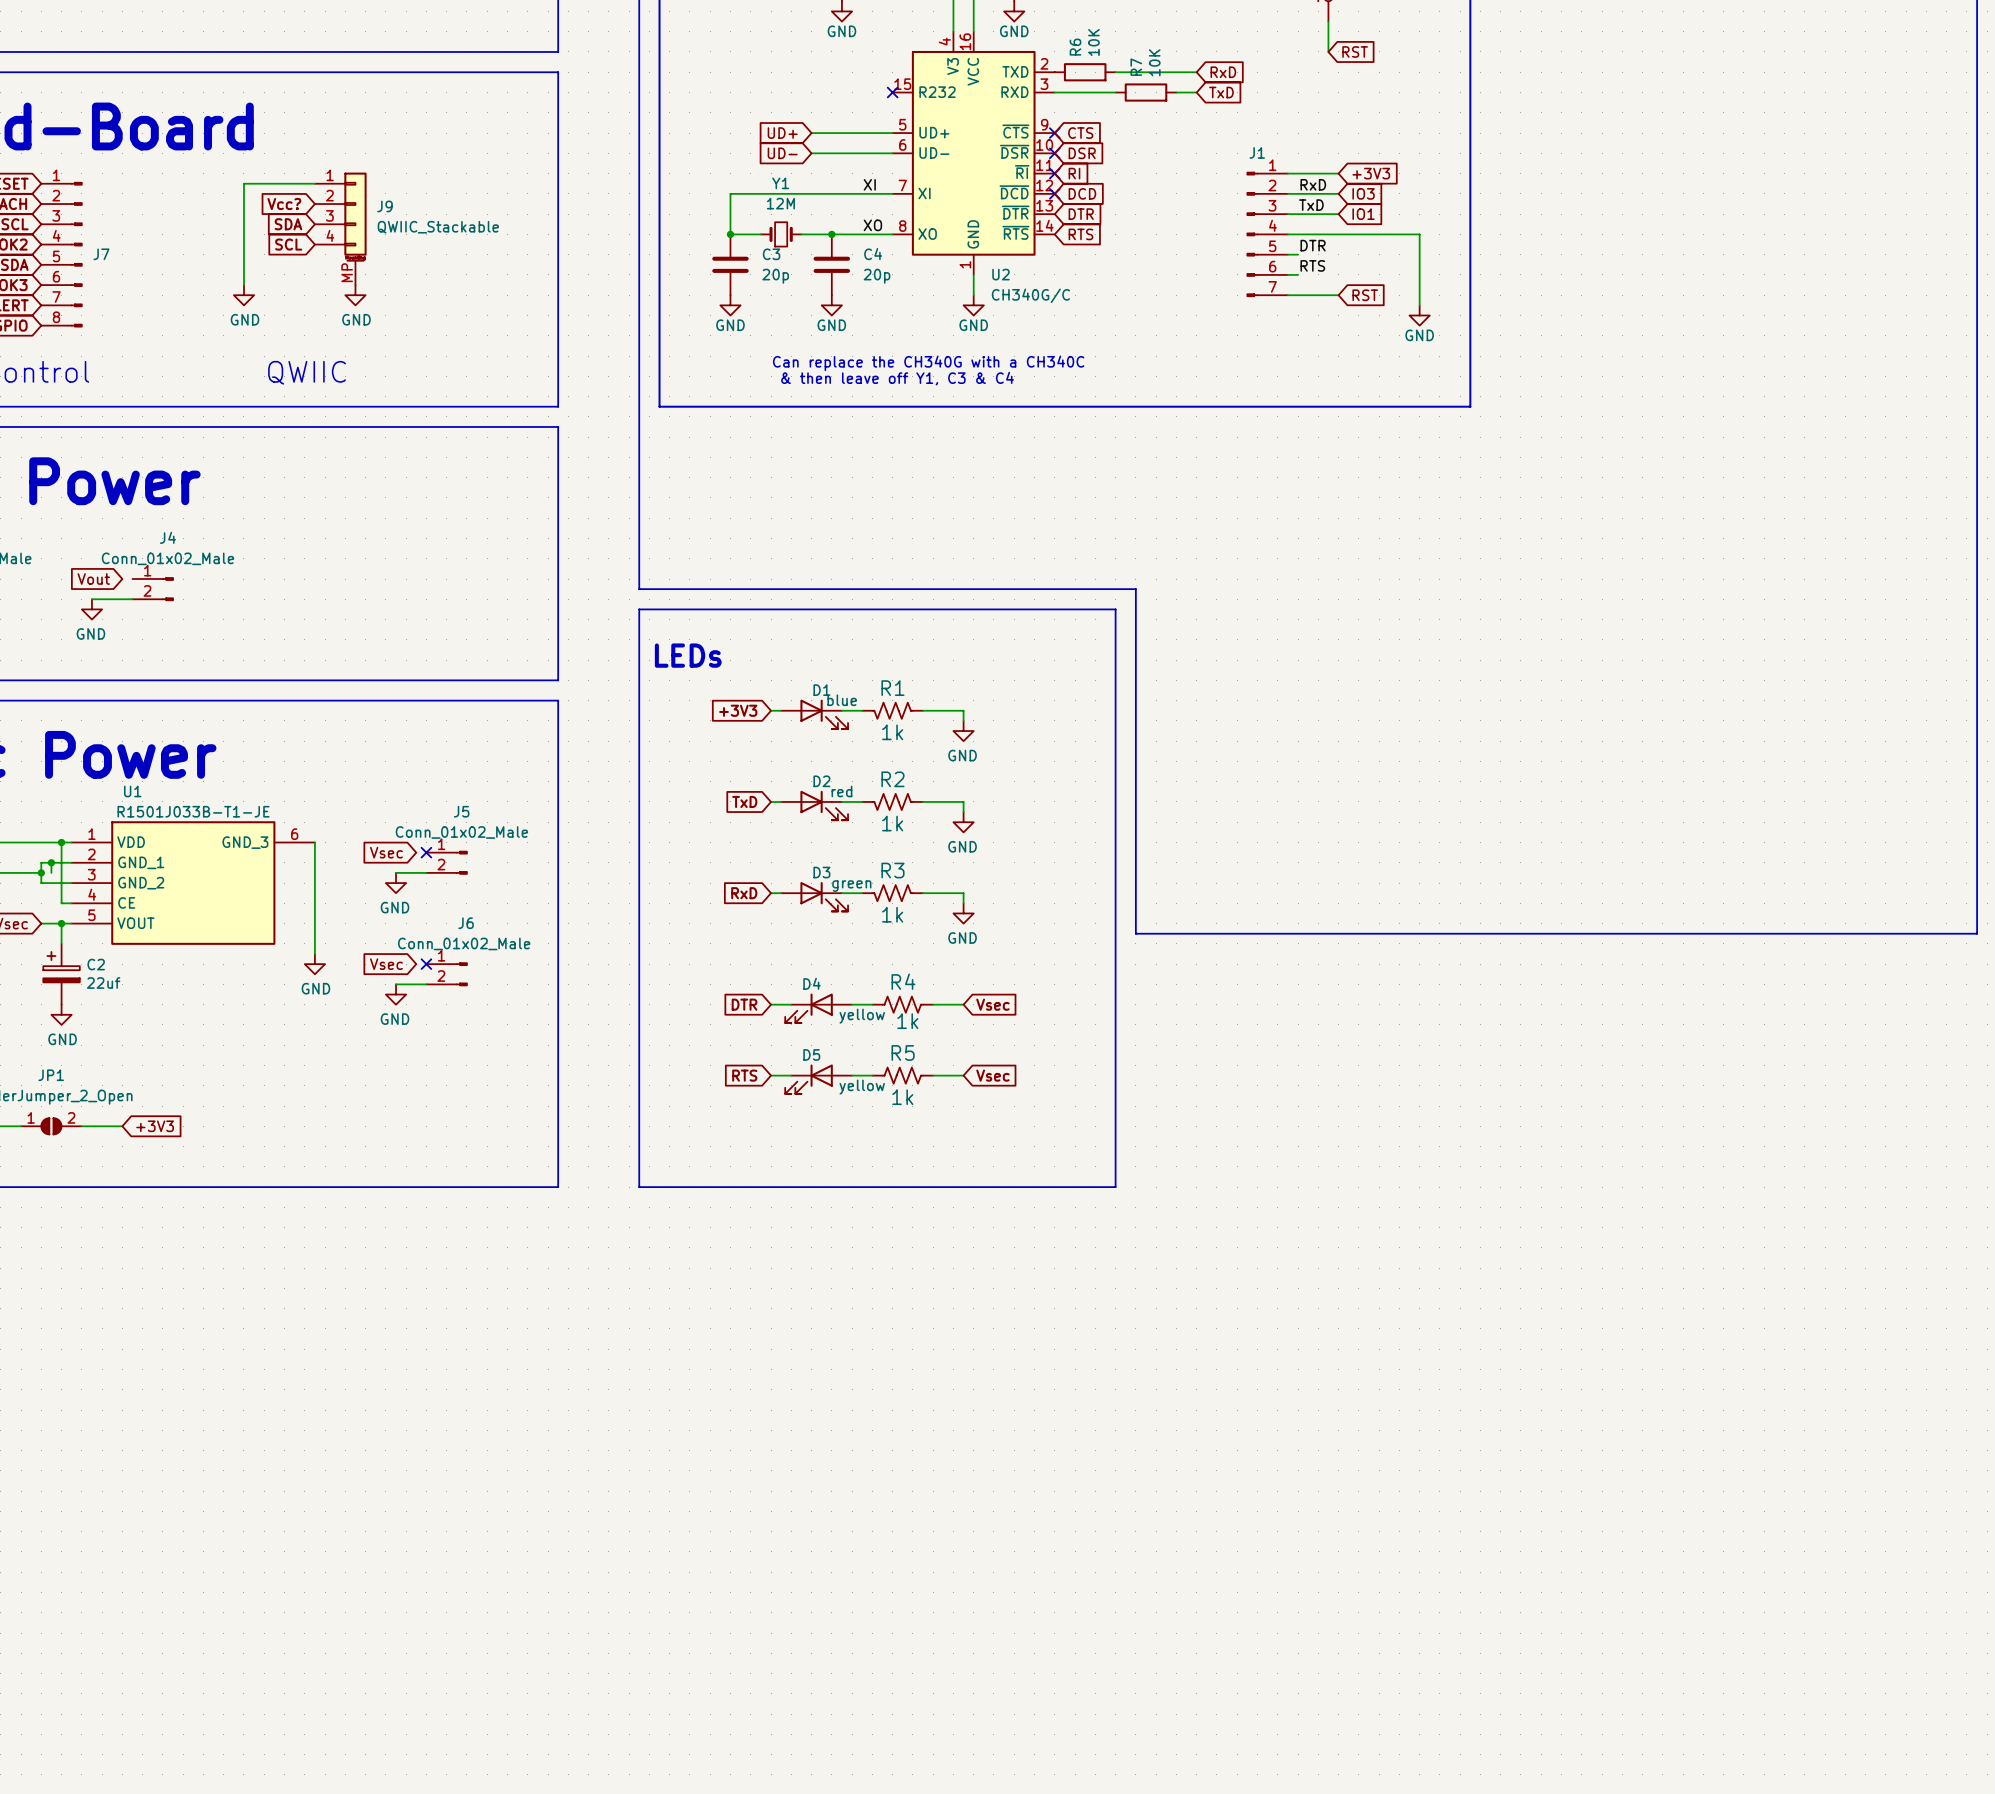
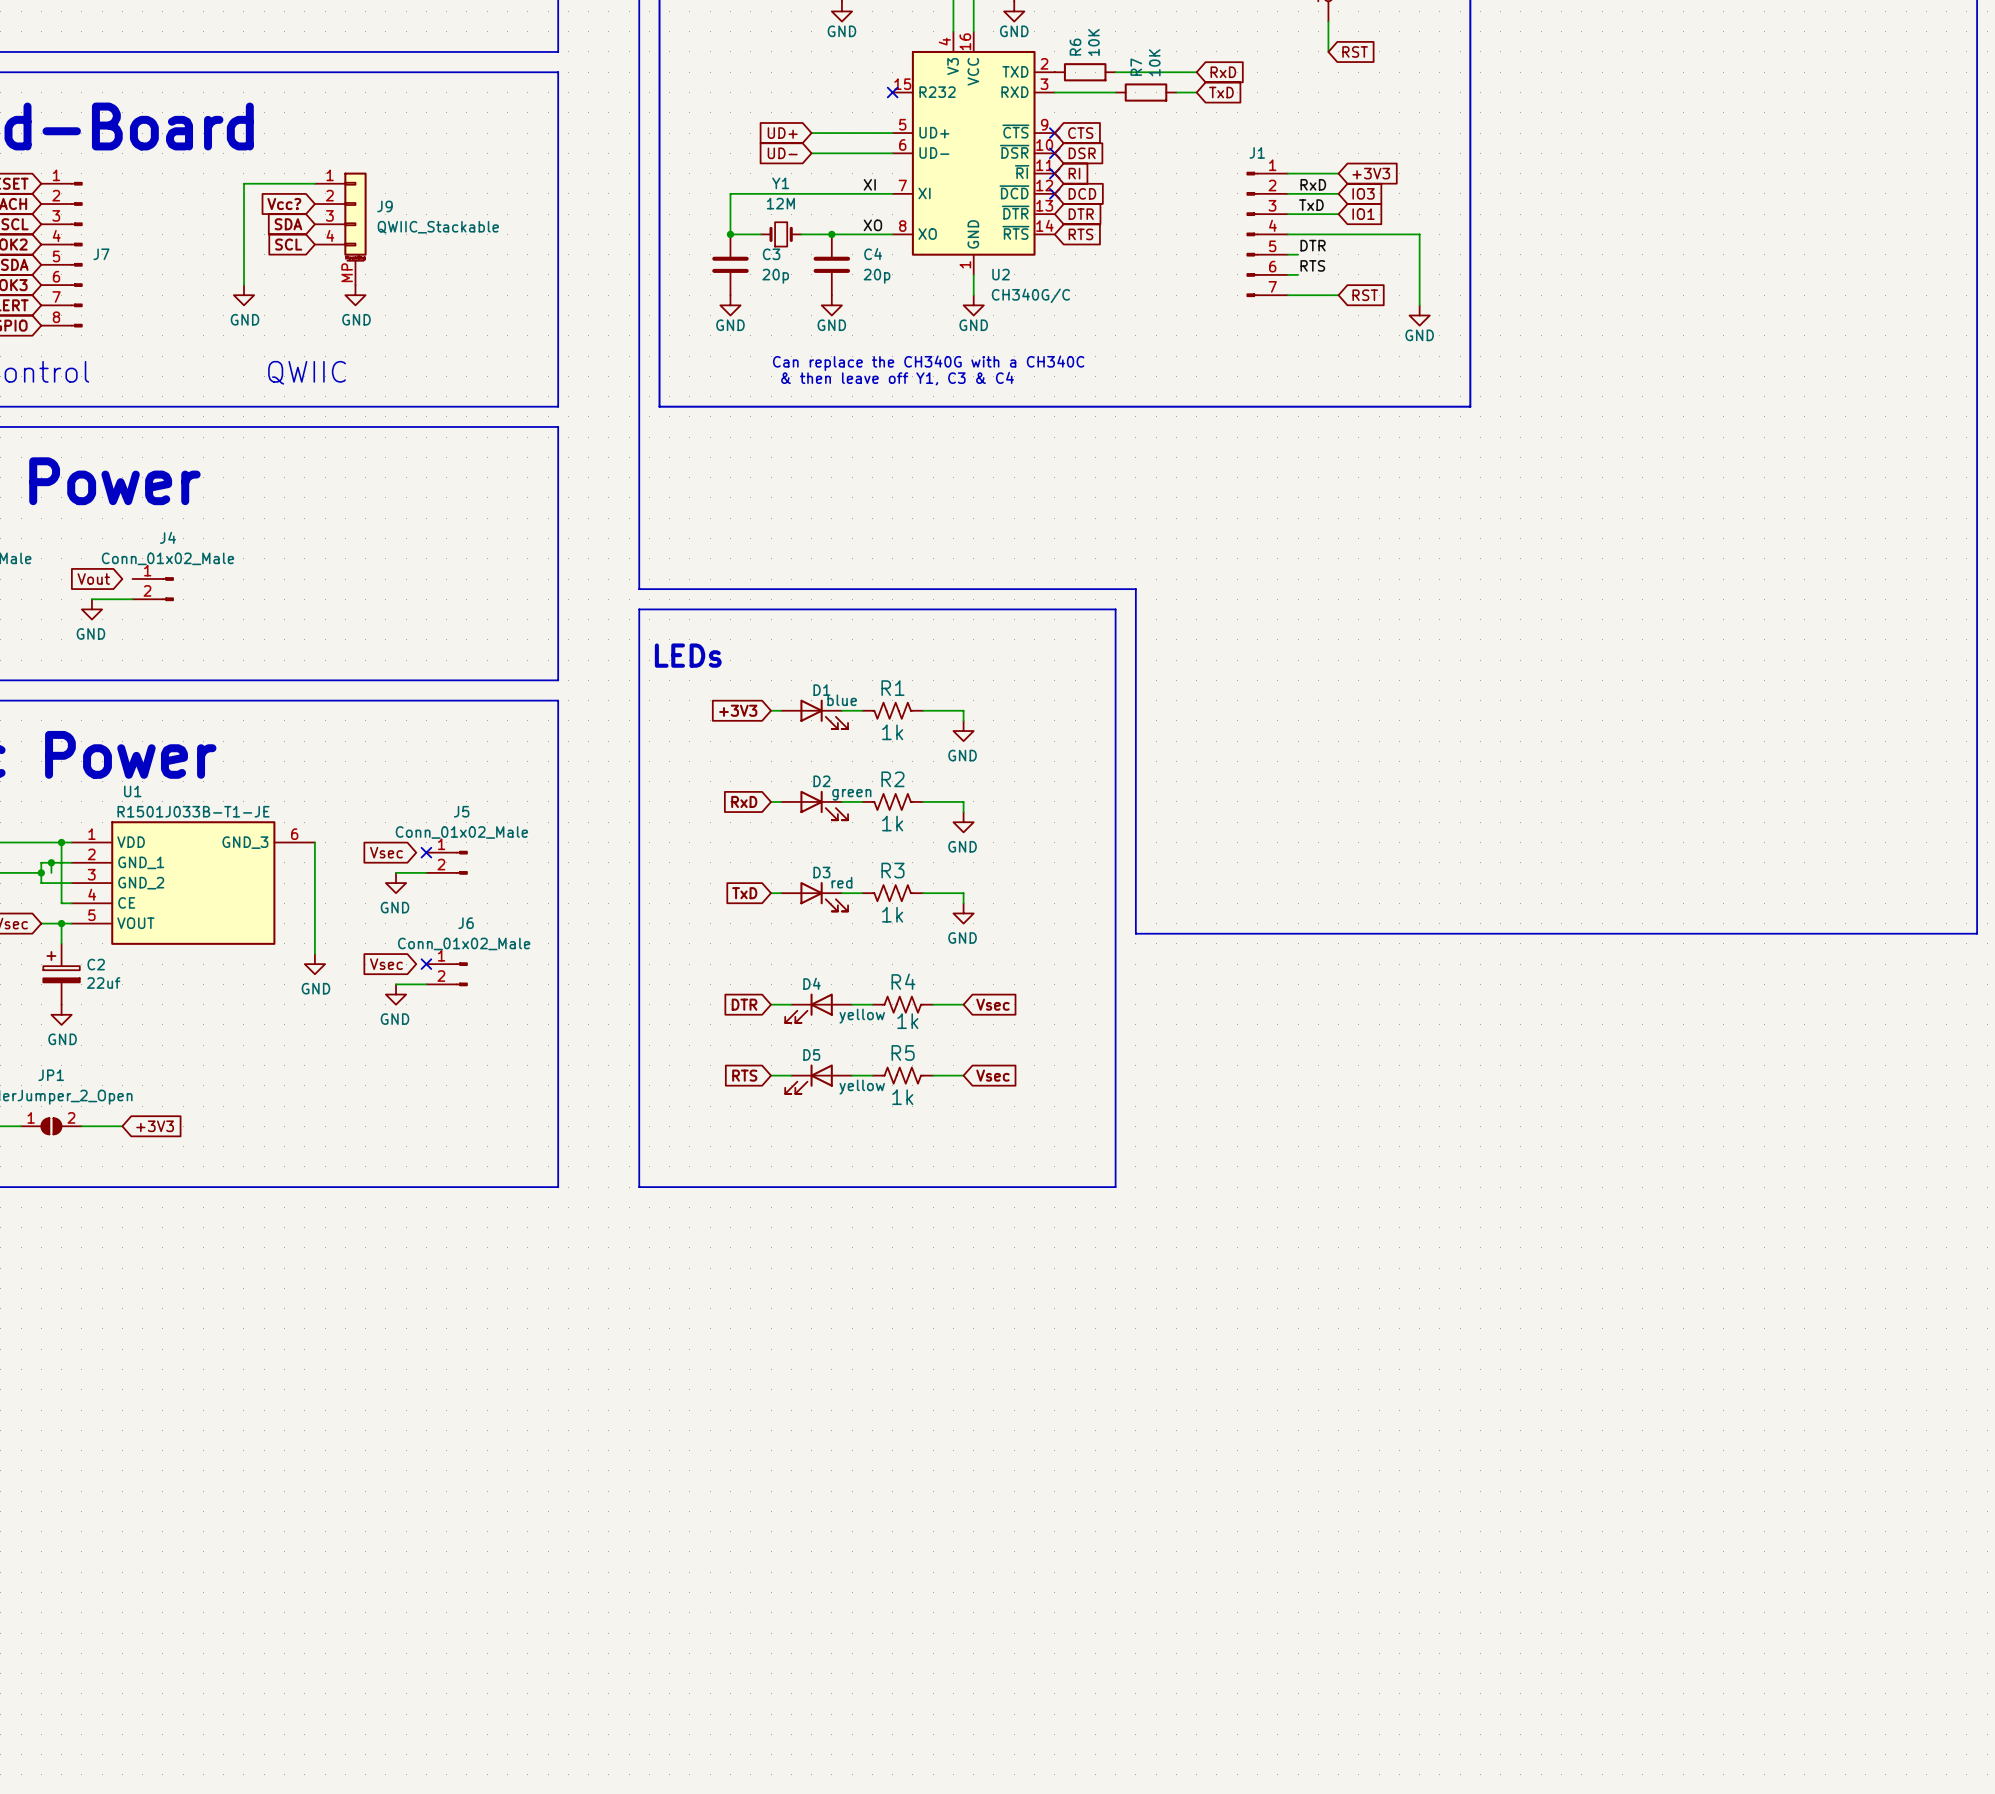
D2 value: red (841, 791) -> green (851, 794)
global label: TxD (744, 801) -> RxD (744, 801)
D3 value: green (851, 886) -> red (841, 882)
global label: RxD (744, 893) -> TxD (744, 893)

